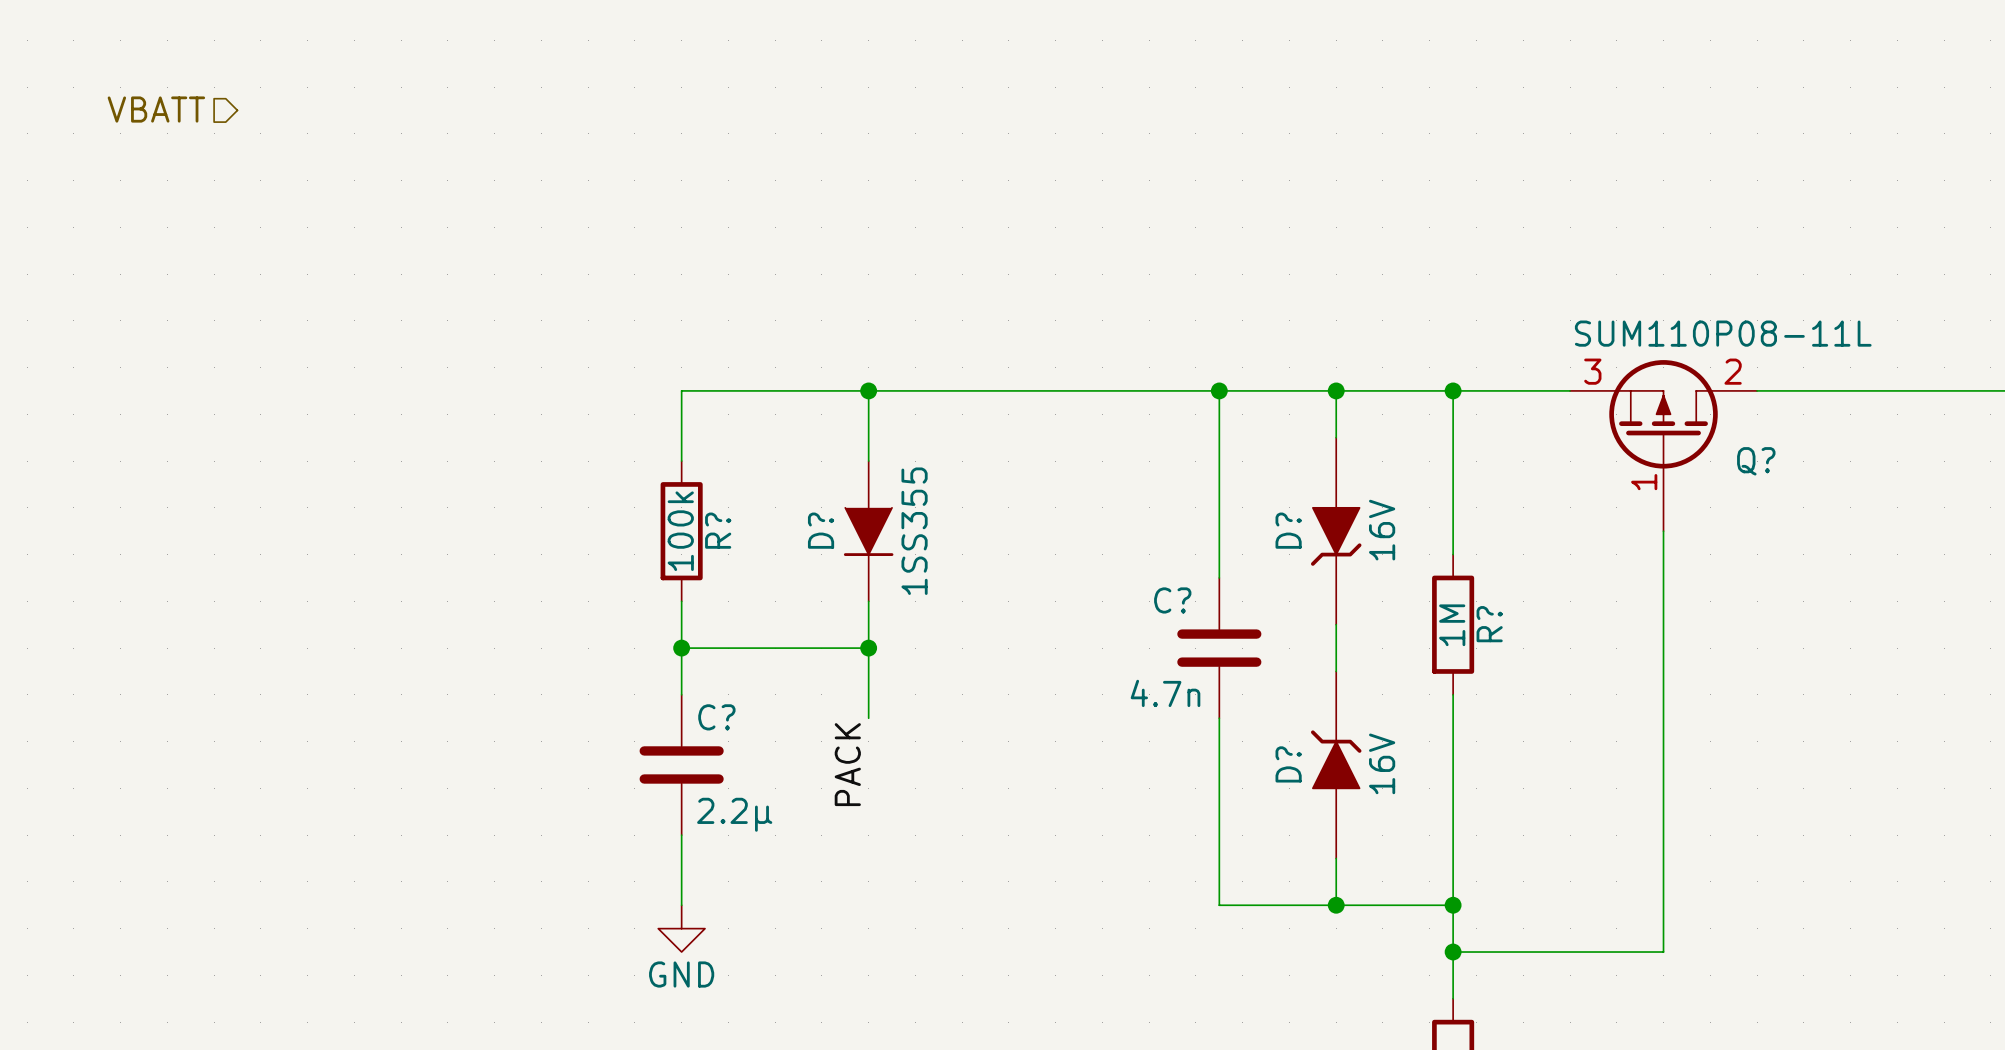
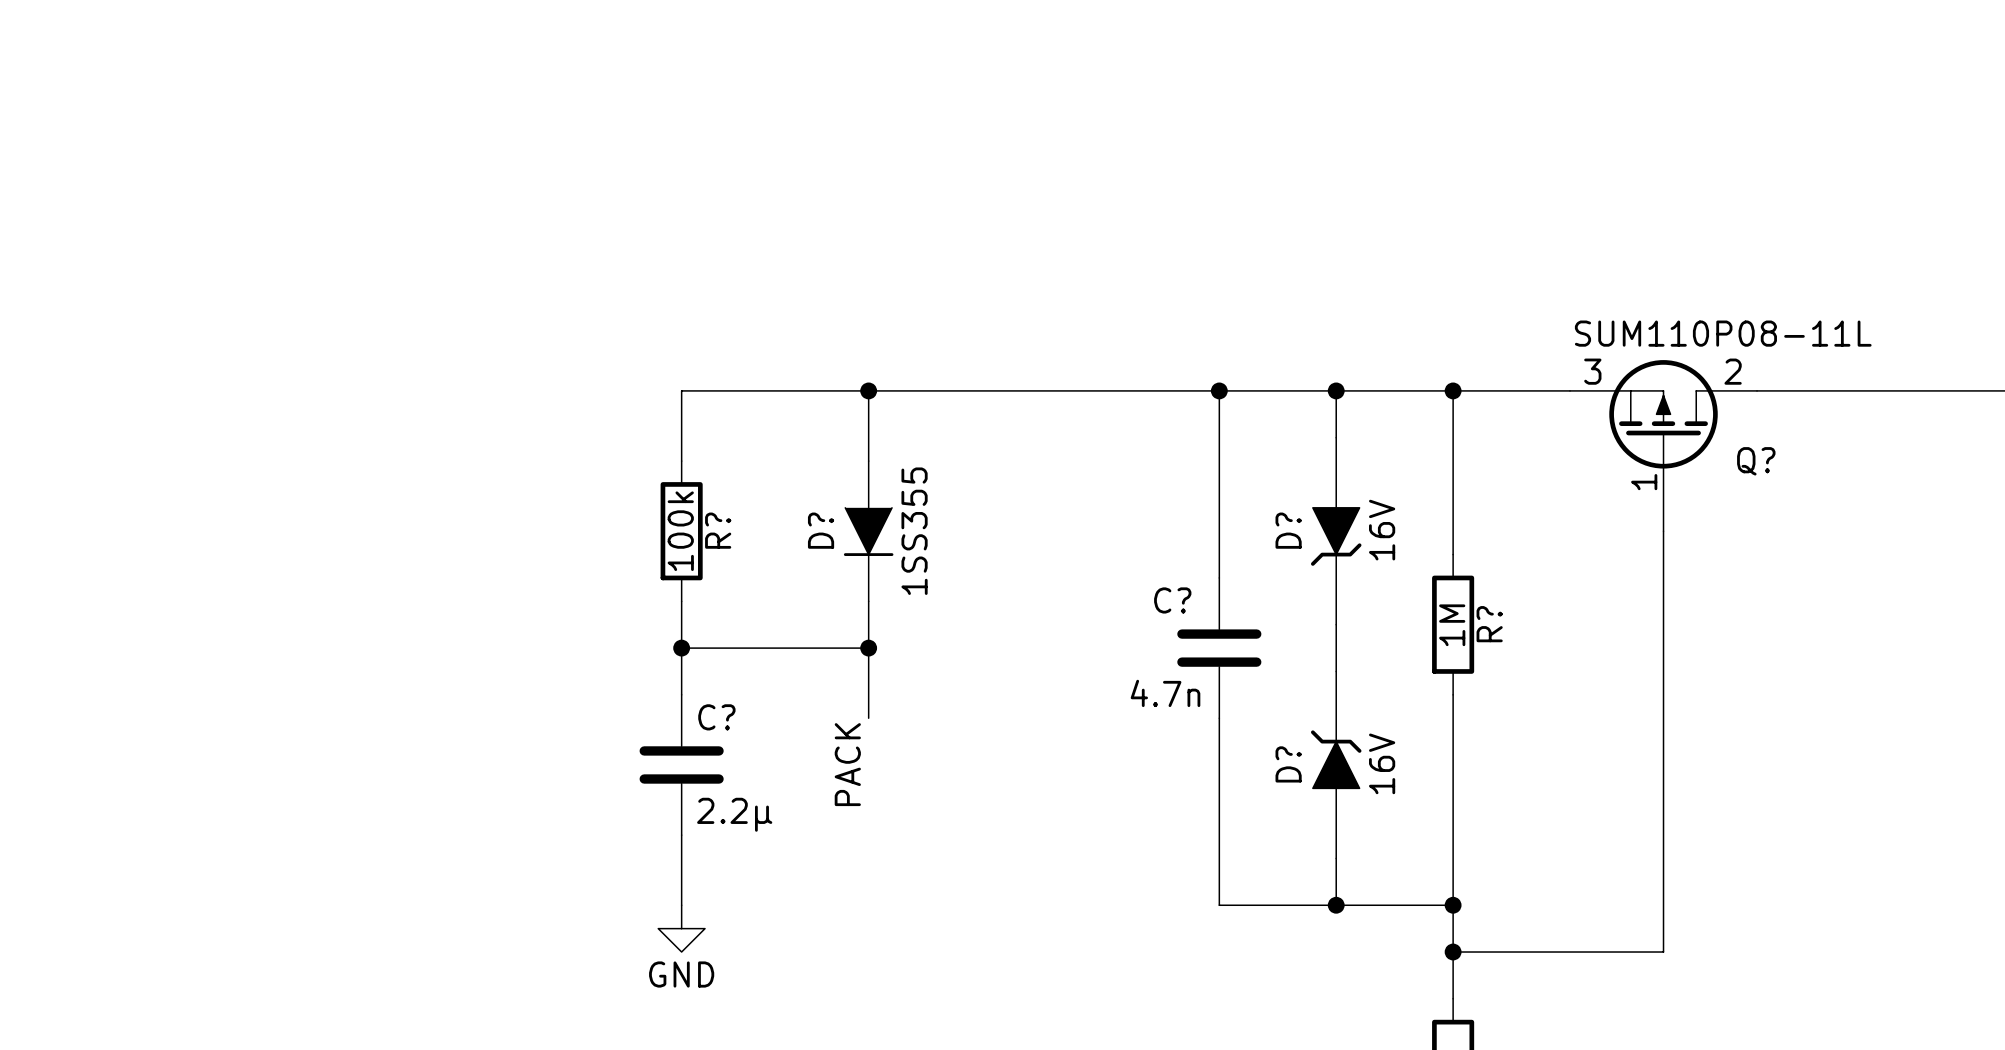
hierarchical label: VBATT (156, 109) -> none

